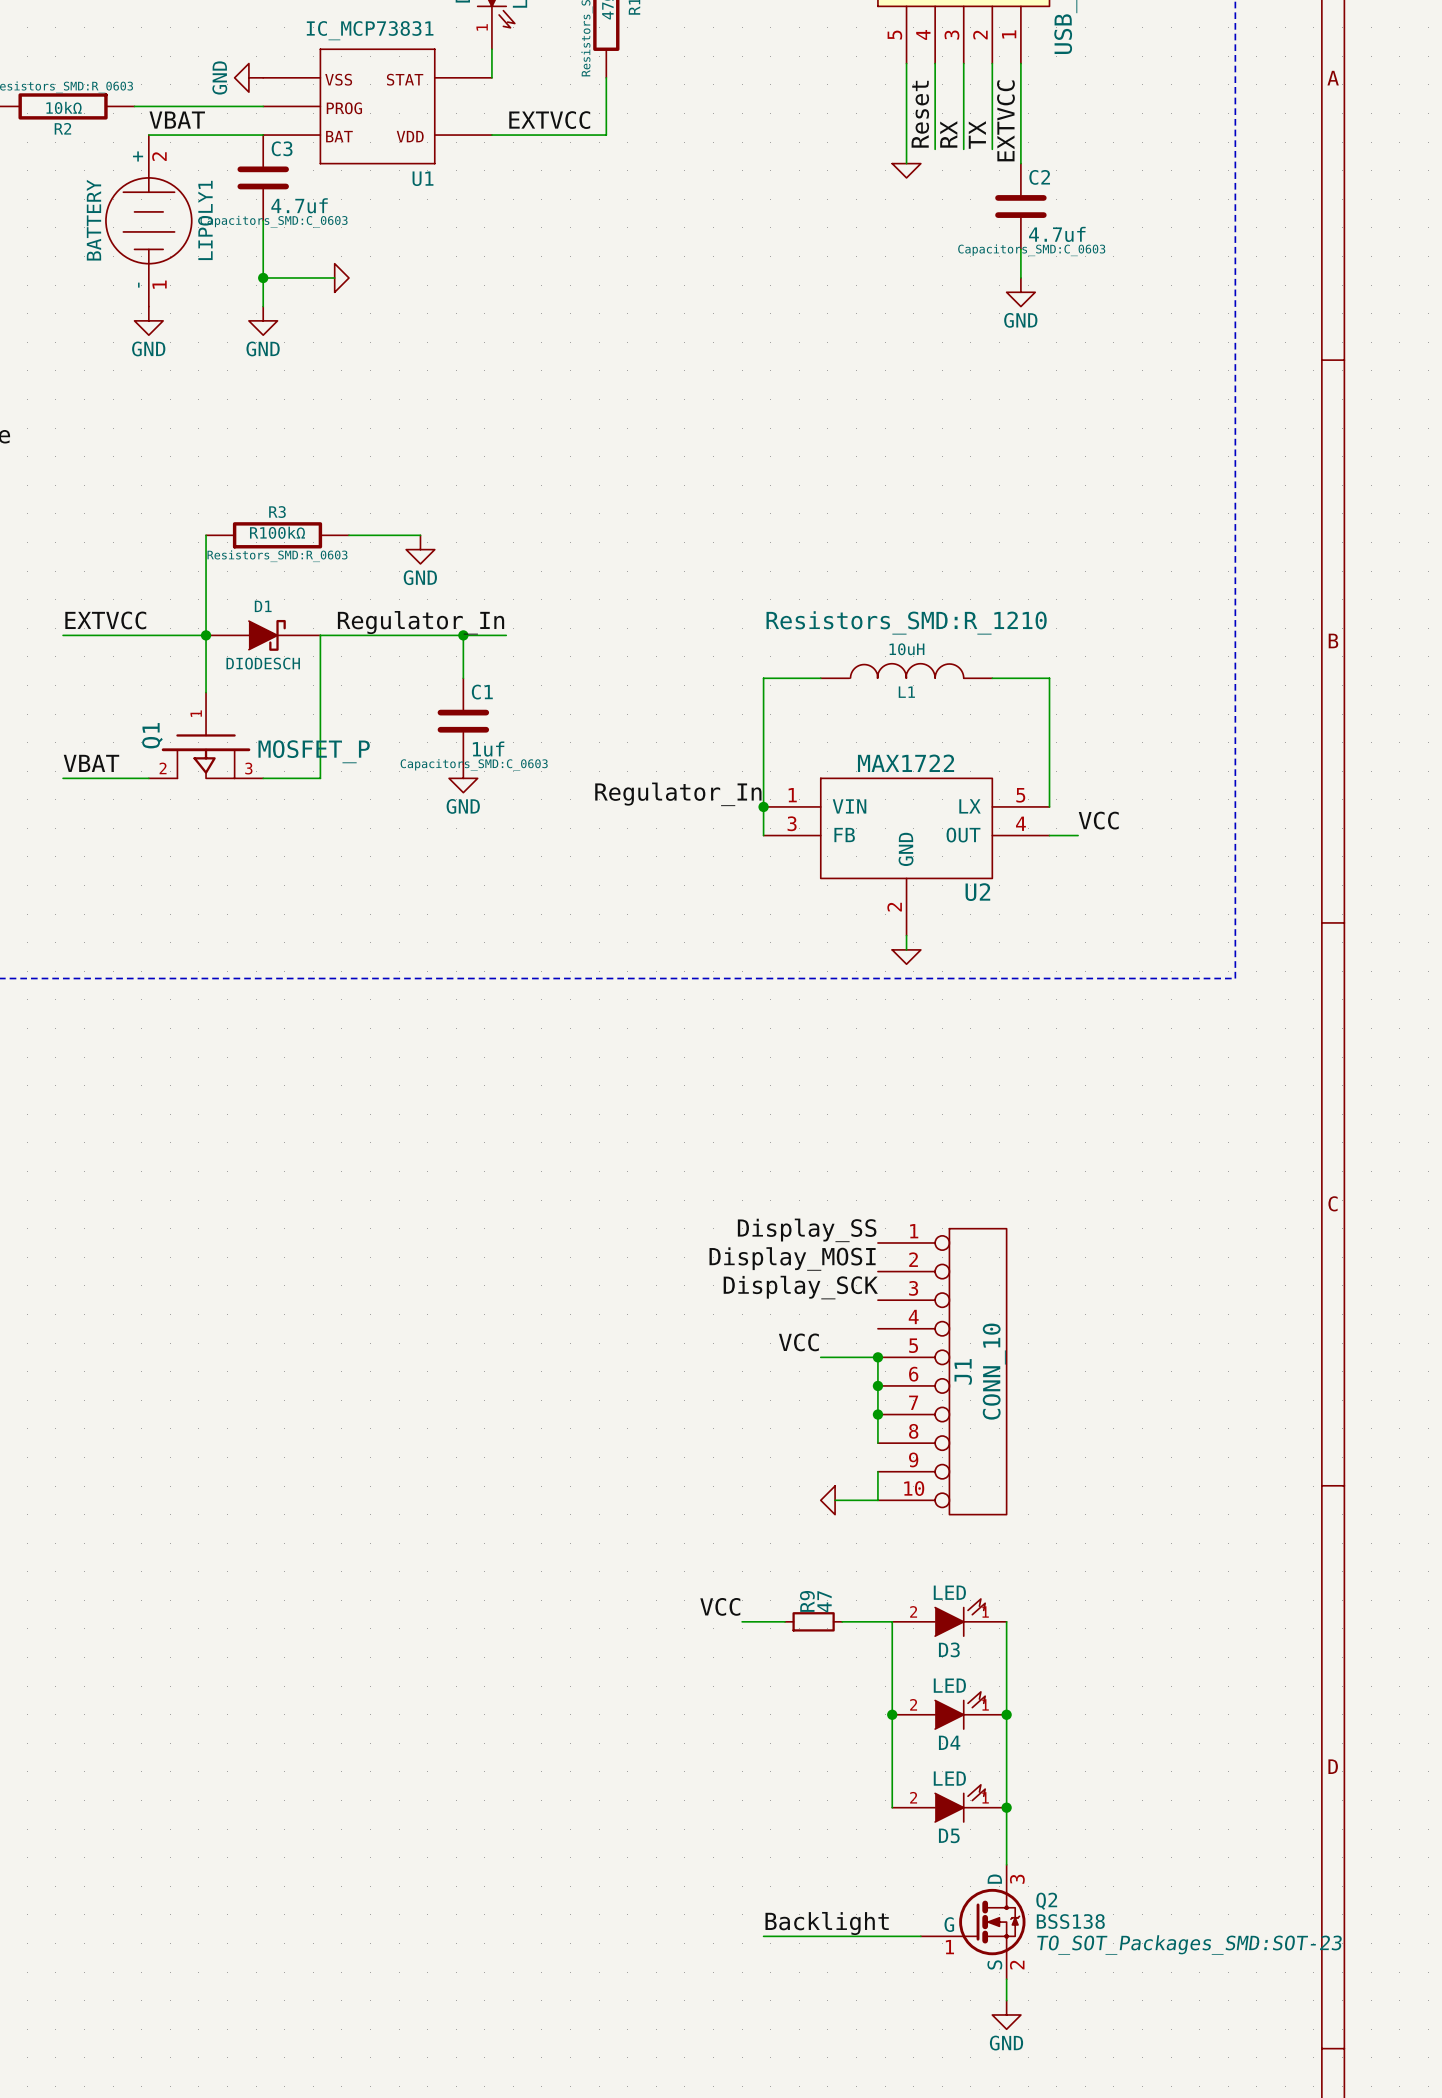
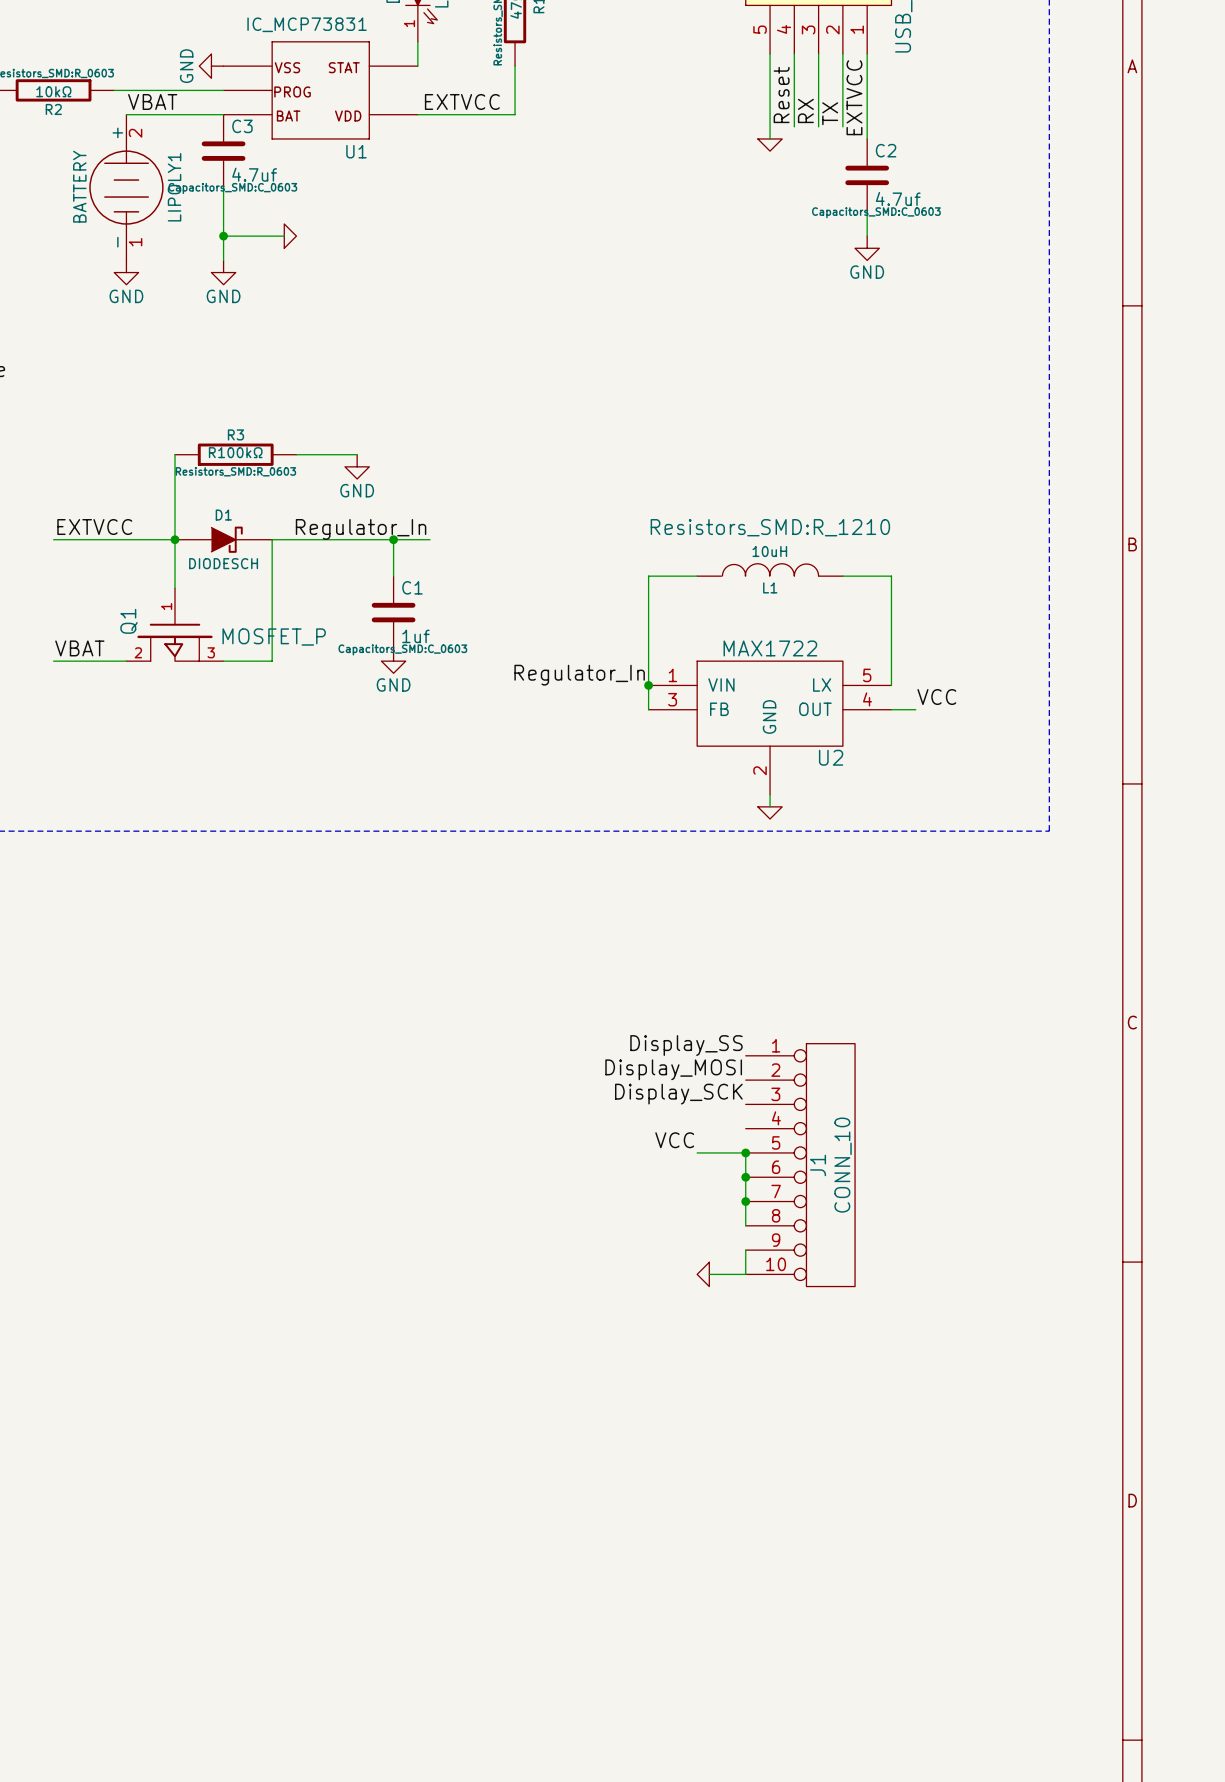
label: VCC (720, 1606) -> none
D3: LED (949, 1617) -> none
wire: (742, 1621) (785, 1621) -> none
R9: 47 (813, 1621) -> none
wire: (842, 1621) (892, 1621) (892, 1807) -> none
wire: (1006, 1621) (1006, 1864) -> none
D4: LED (949, 1710) -> none
junction: (892, 1714) -> none
junction: (1006, 1714) -> none
D5: LED (949, 1803) -> none
junction: (1006, 1807) -> none
Q2: BSS138 (973, 1922) -> none
label: Backlight (827, 1923) -> none
wire: (763, 1936) (920, 1936) -> none
wire: (1006, 1979) (1006, 2000) -> none
power symbol: GND (1006, 2014) -> none

